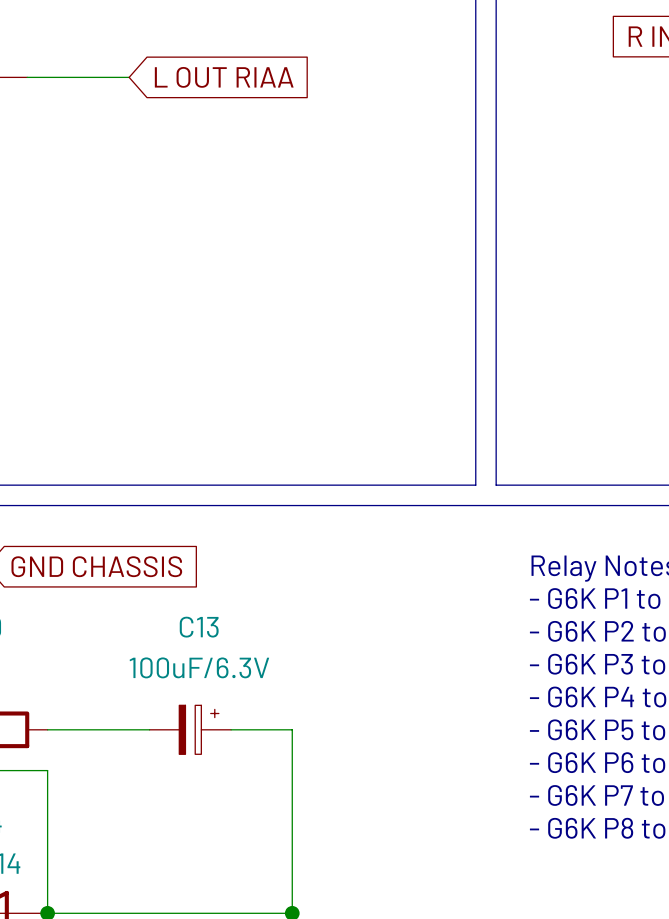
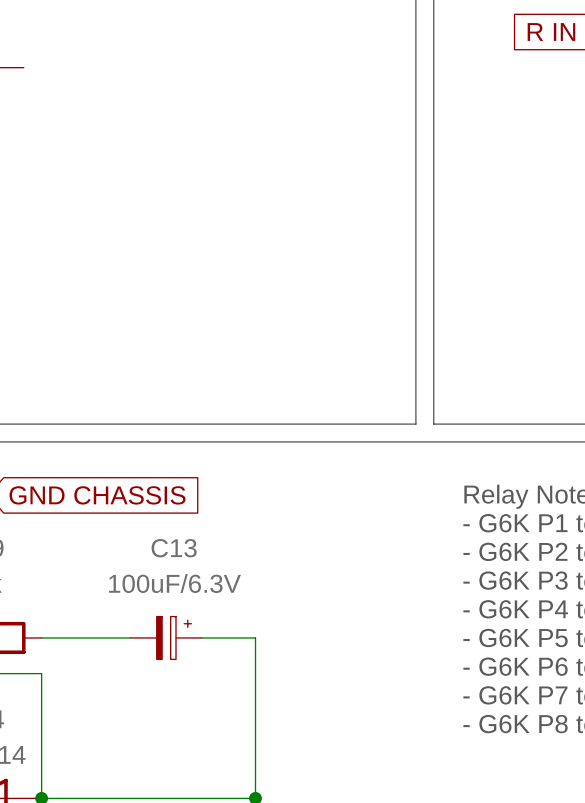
wire: (27, 77) (129, 77) -> none
global label: L OUT RIAA (224, 77) -> none

